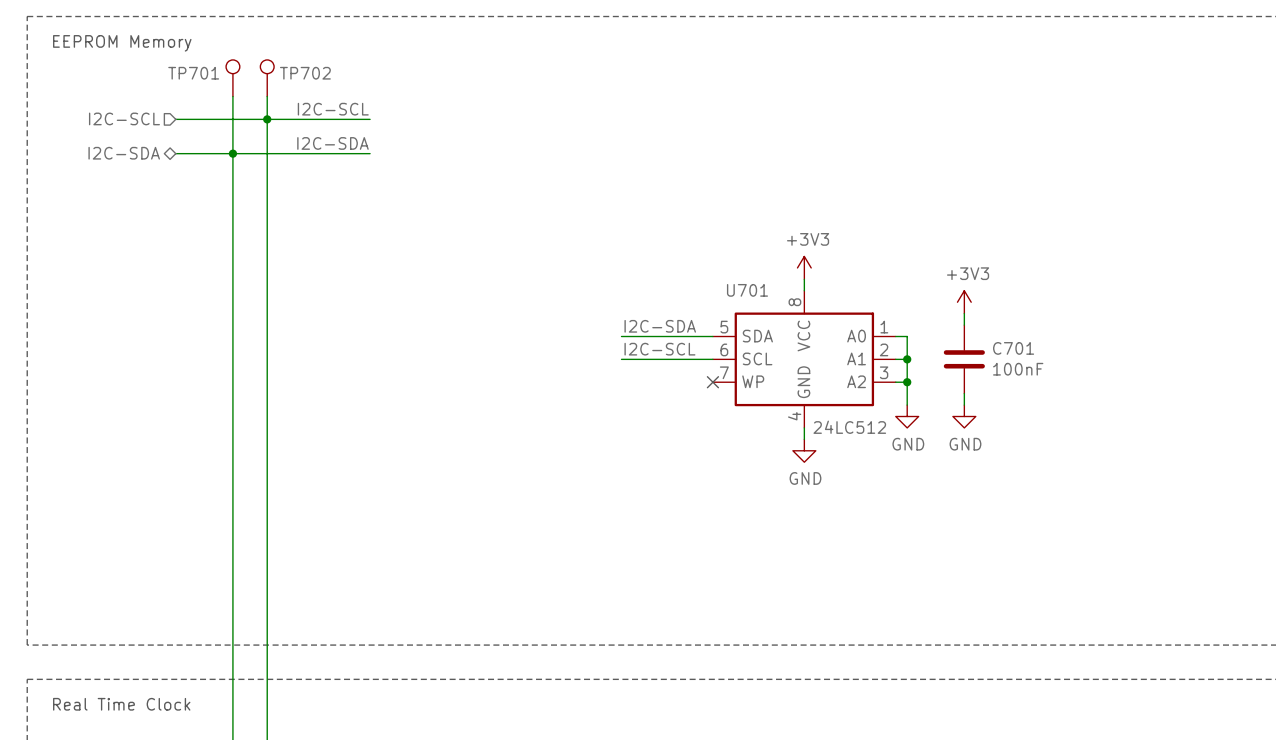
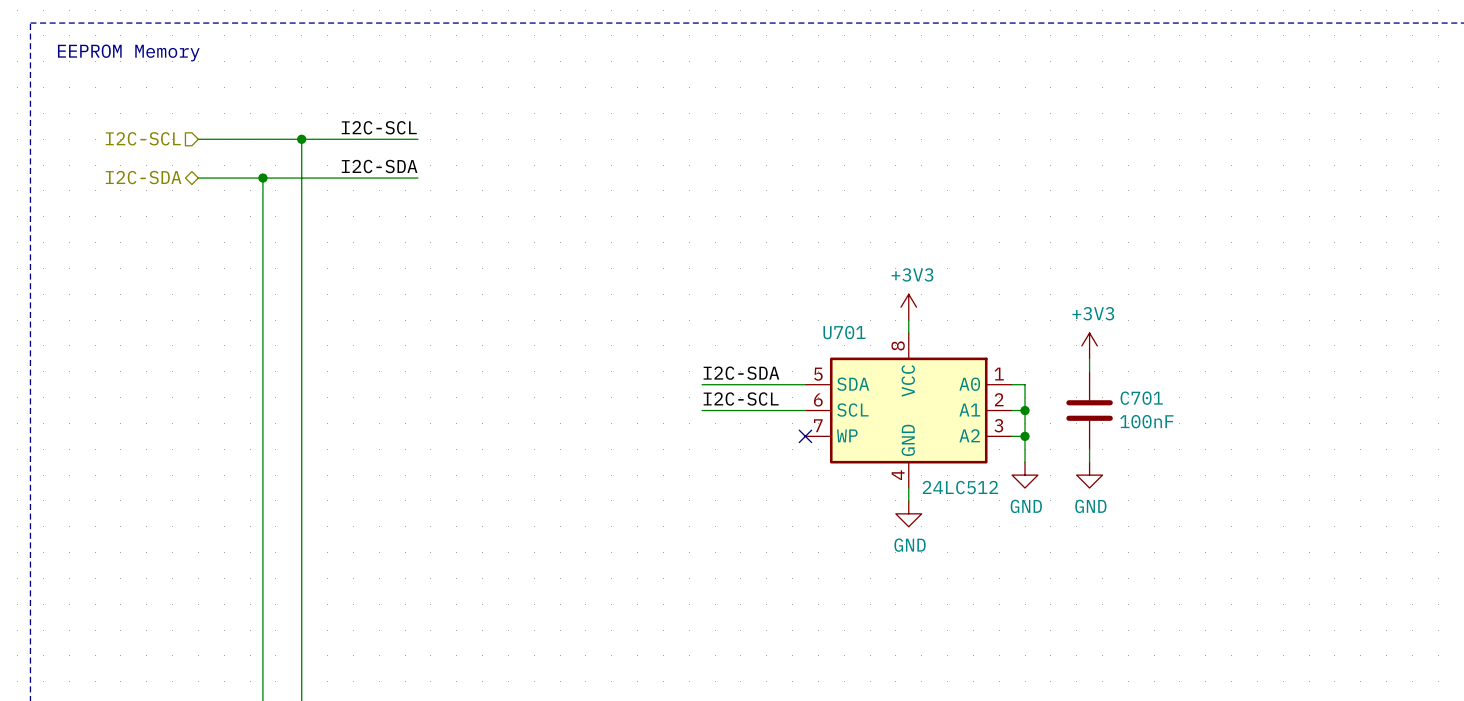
TP701: (232, 78) -> none
TP702: (267, 78) -> none
wire: (232, 96) (232, 153) -> none
wire: (267, 96) (267, 119) -> none

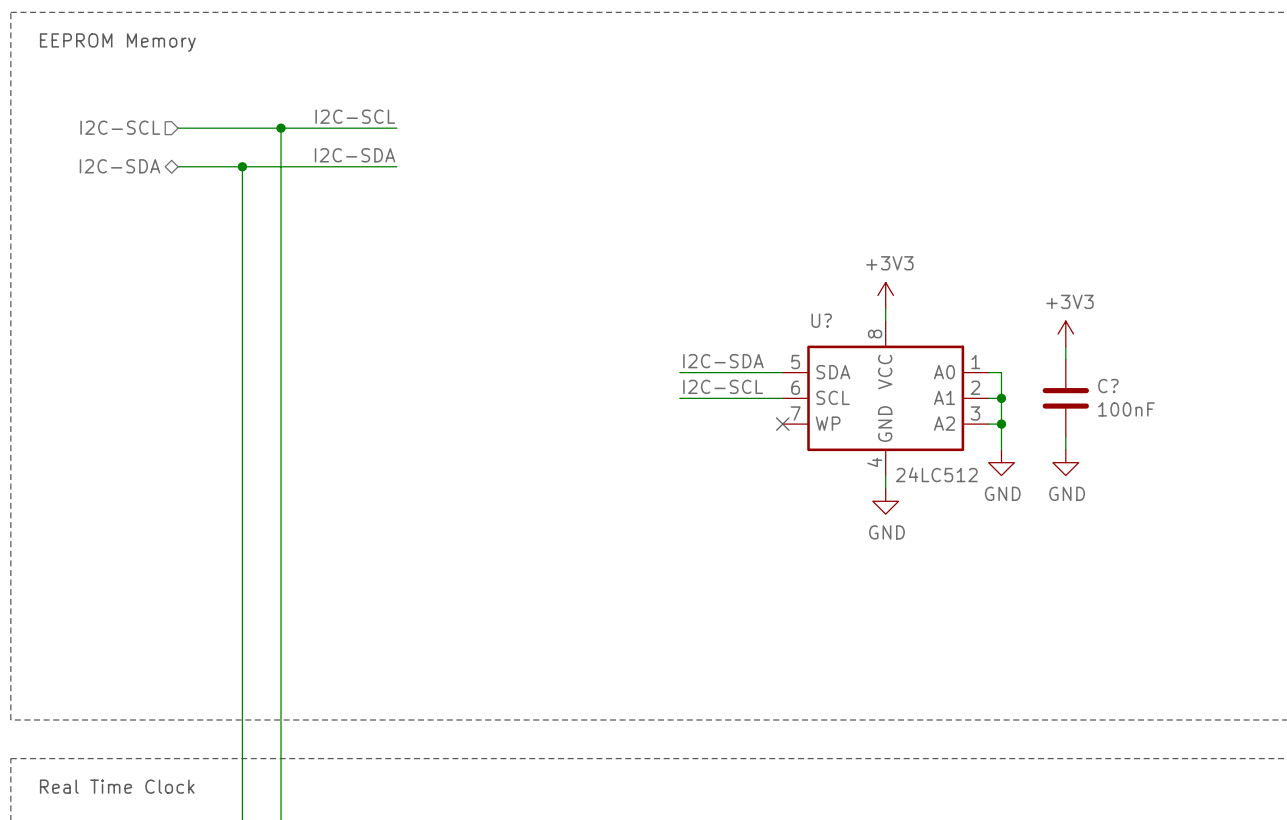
U701 name: U701 (844, 332) -> U? (821, 320)
C701 name: C701 (1141, 398) -> C? (1108, 386)

